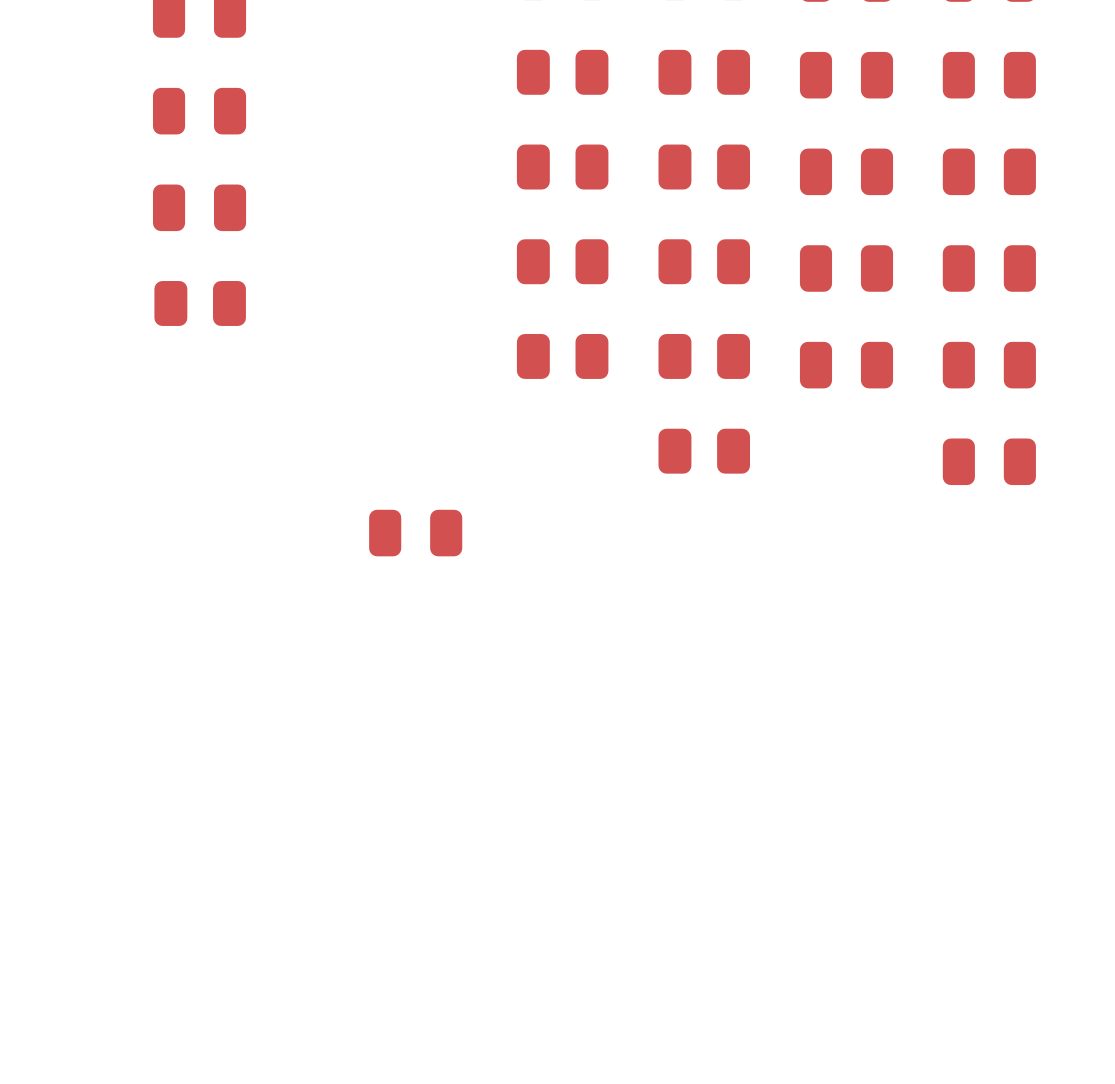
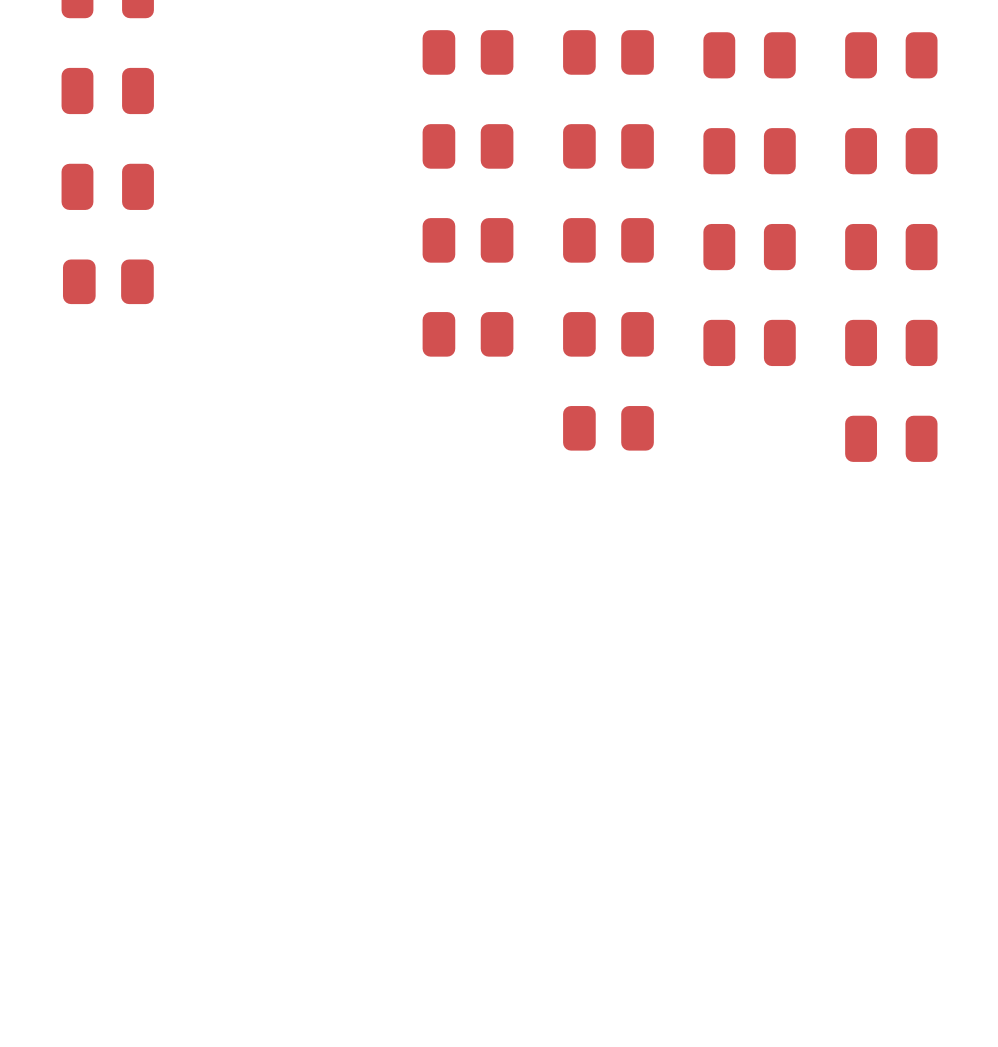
part: (415, 533) -> none

